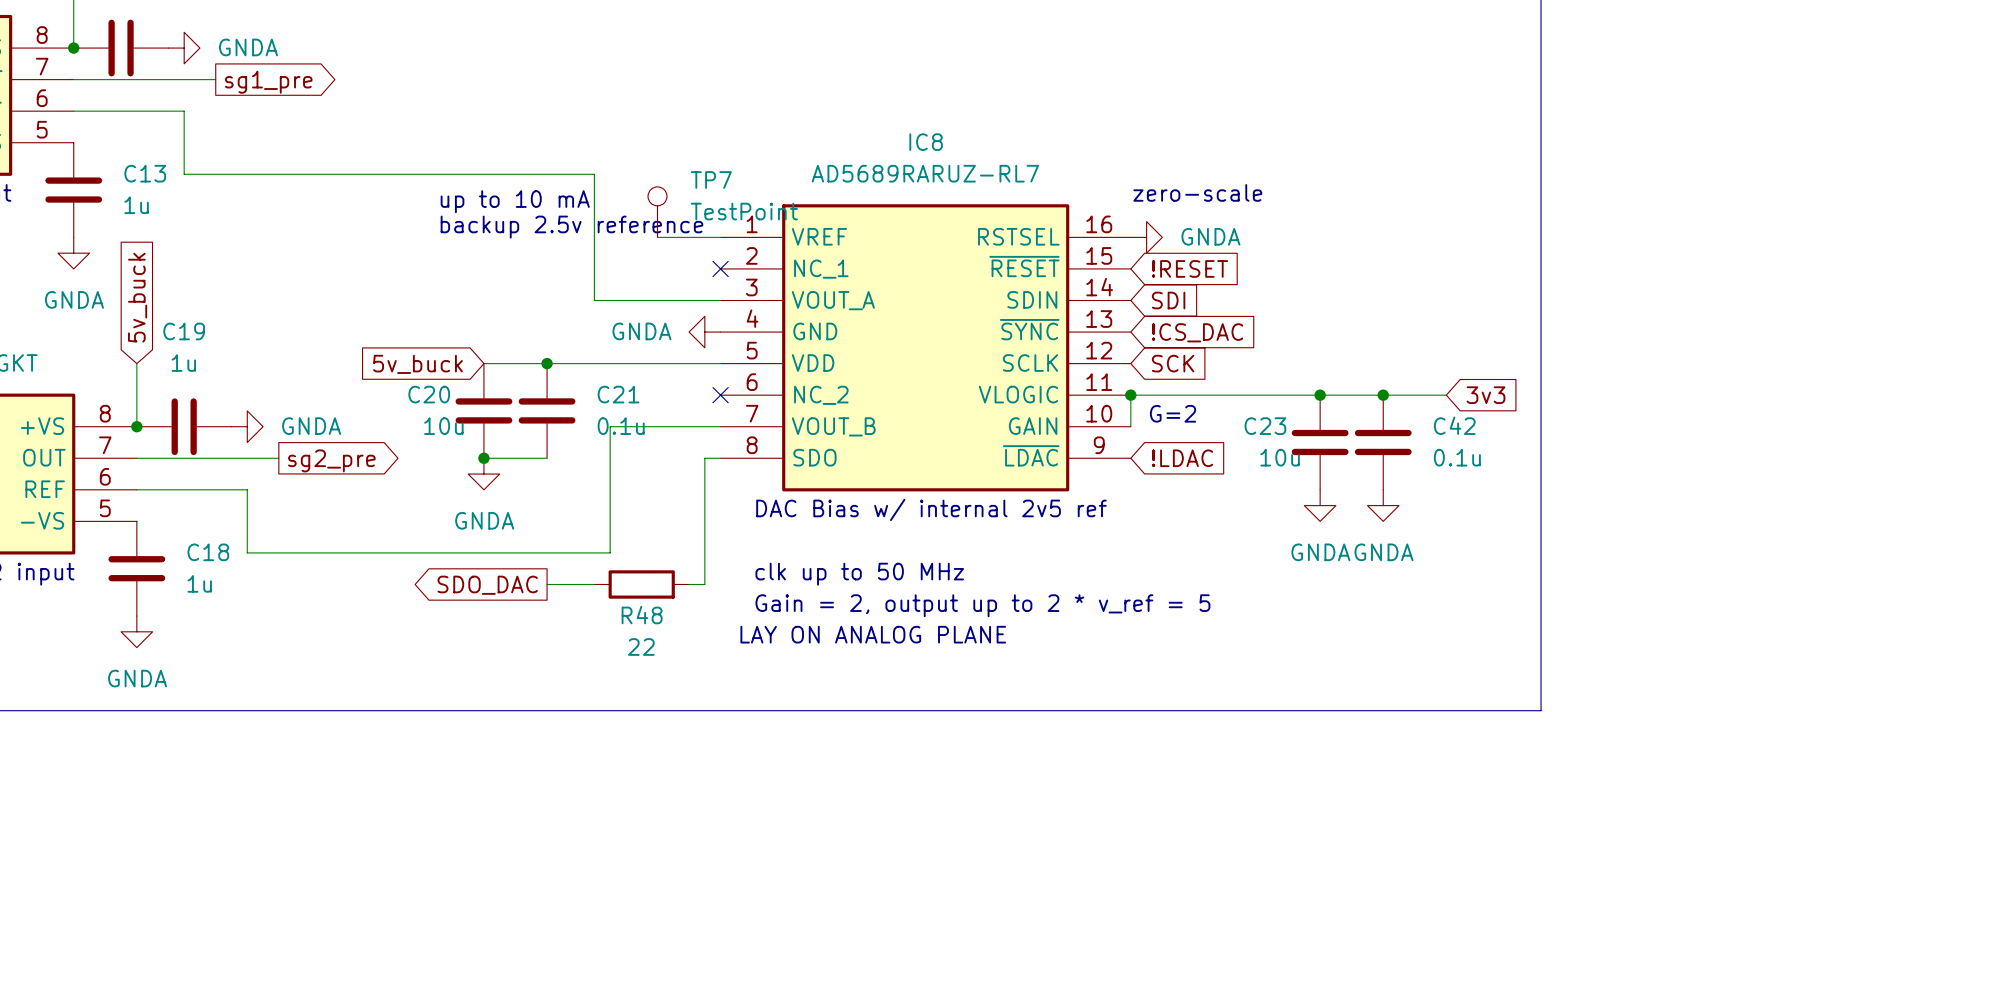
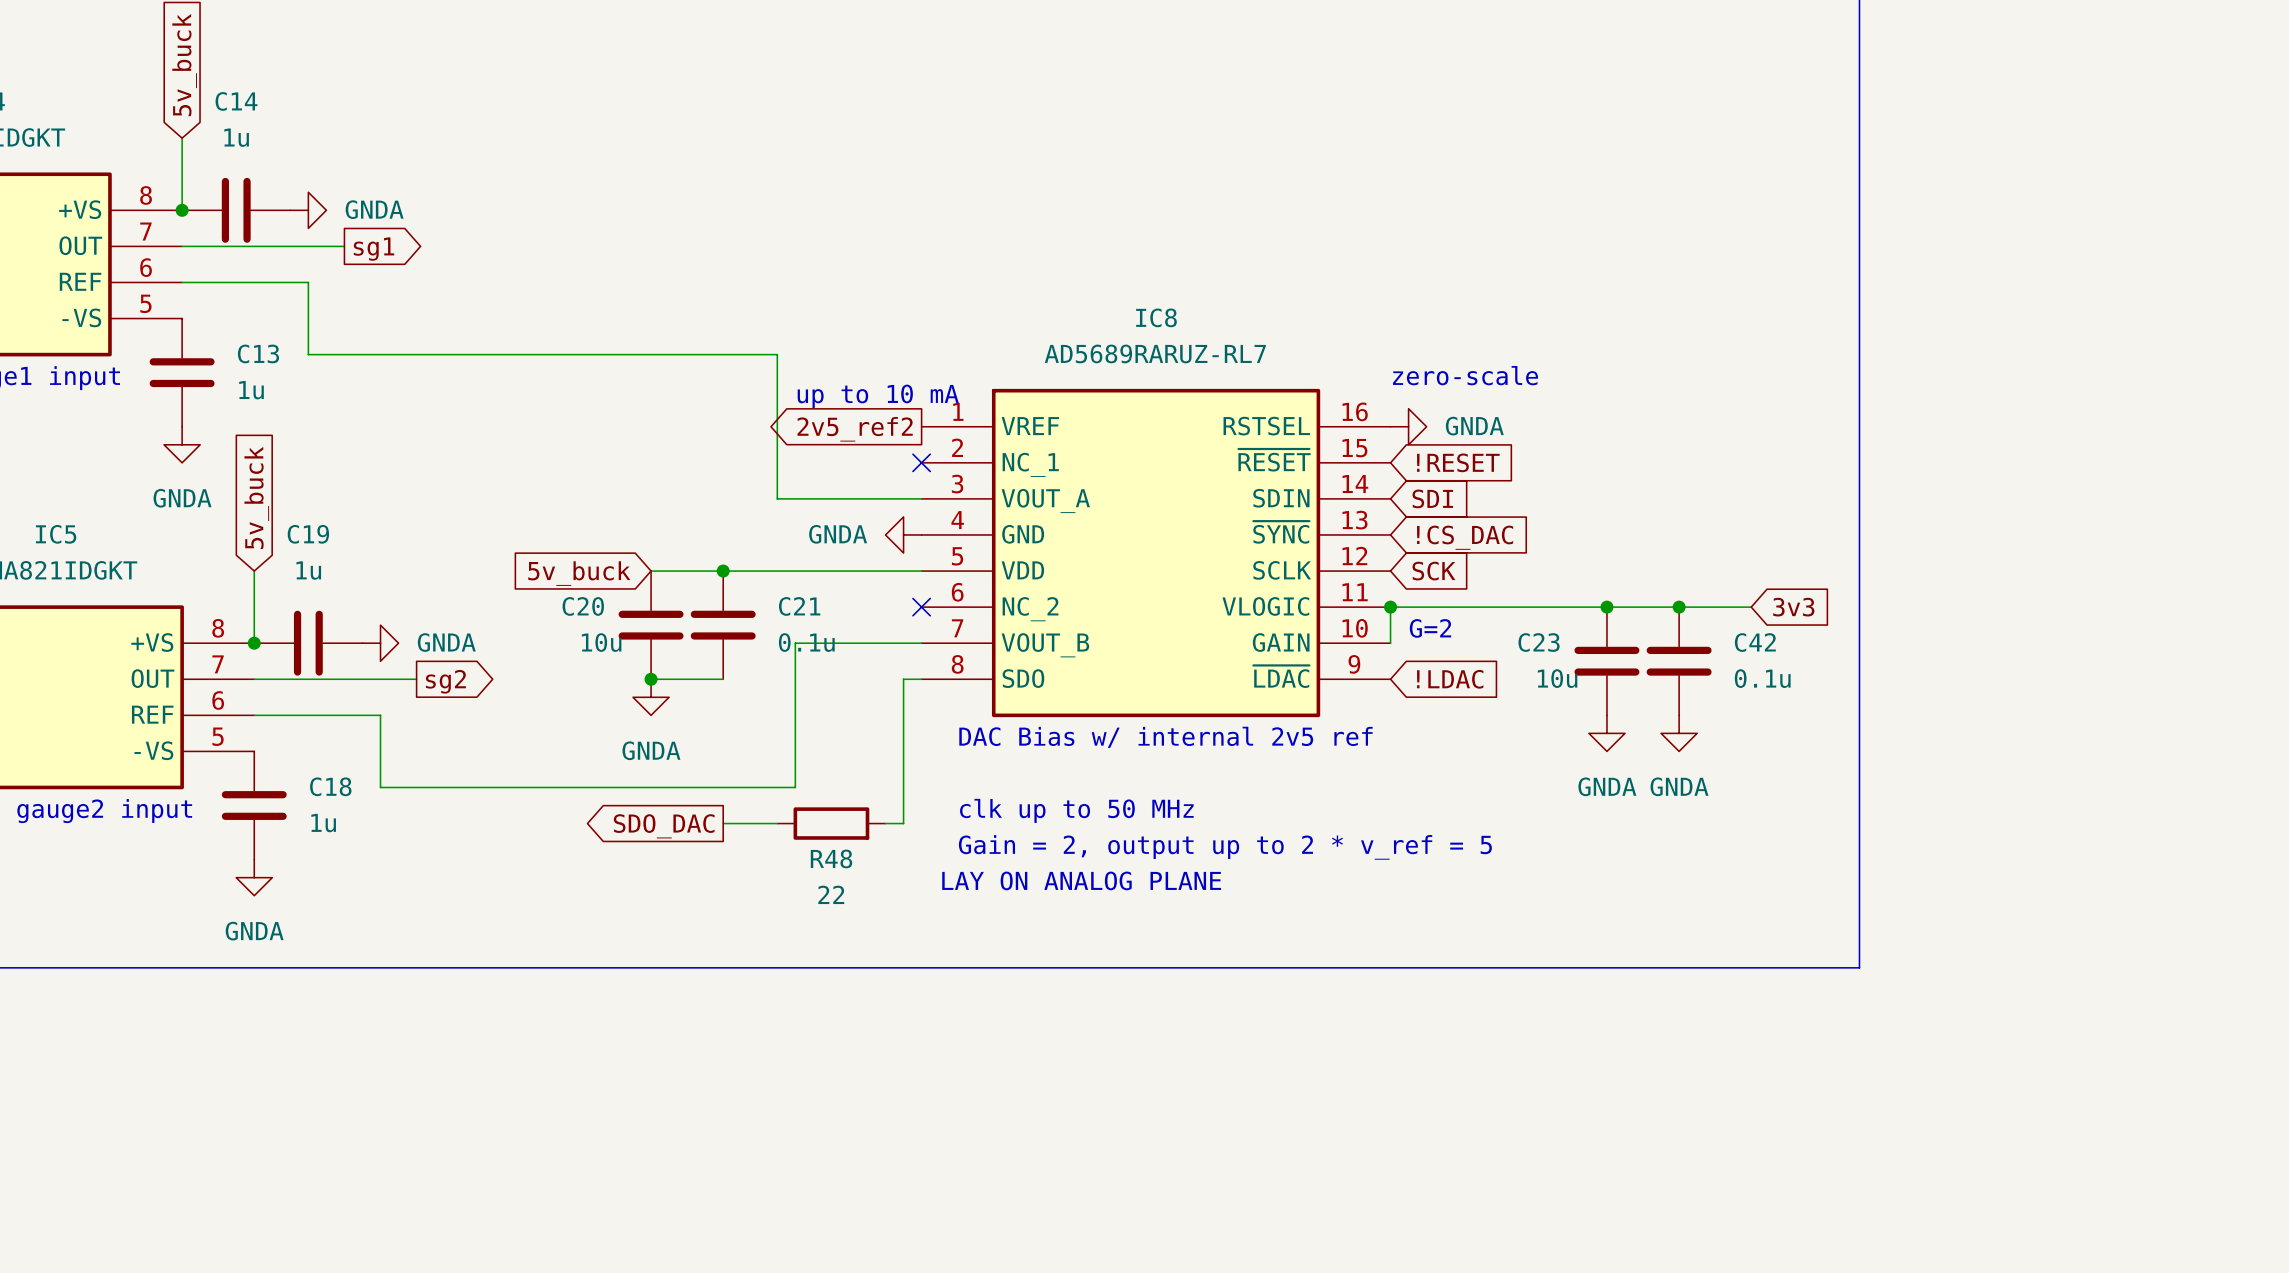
global label: sg1_pre (268, 82) -> sg1 (374, 249)
text position: up to 10 mA (515, 201) -> up to 10 mA (878, 396)
TP7: TestPoint (657, 212) -> none
text: backup 2.5v reference (571, 227) -> none
wire: (657, 237) (720, 237) -> none
global label: none -> 2v5_ref2 (855, 429)
global label: sg2_pre (331, 460) -> sg2 (445, 681)

